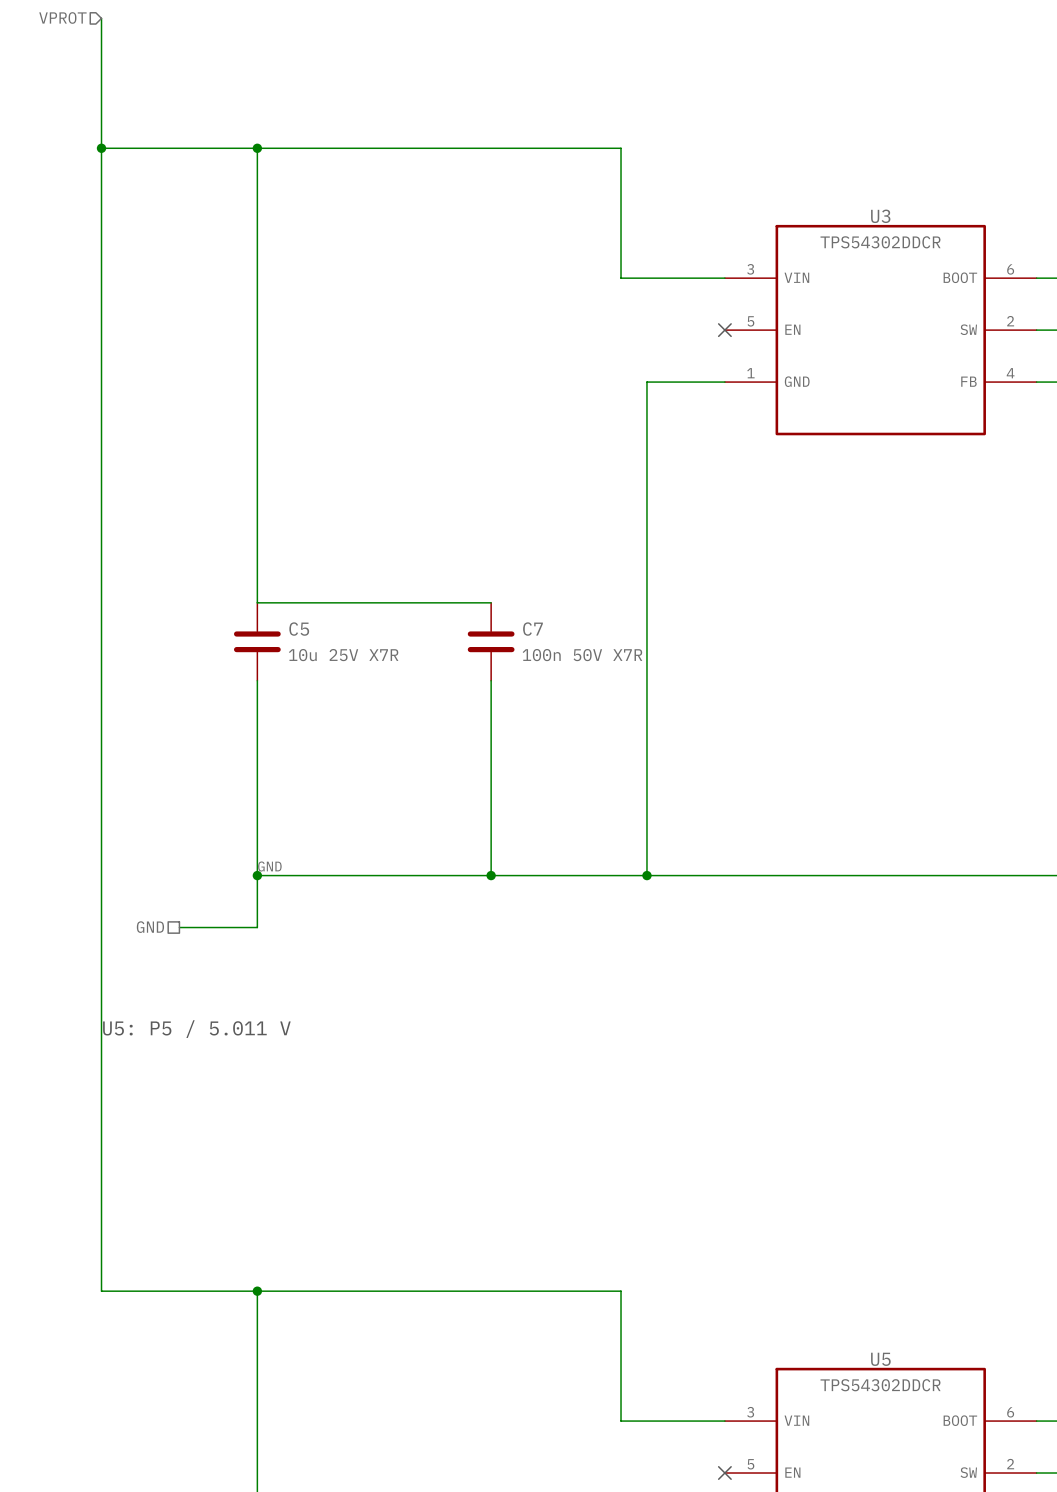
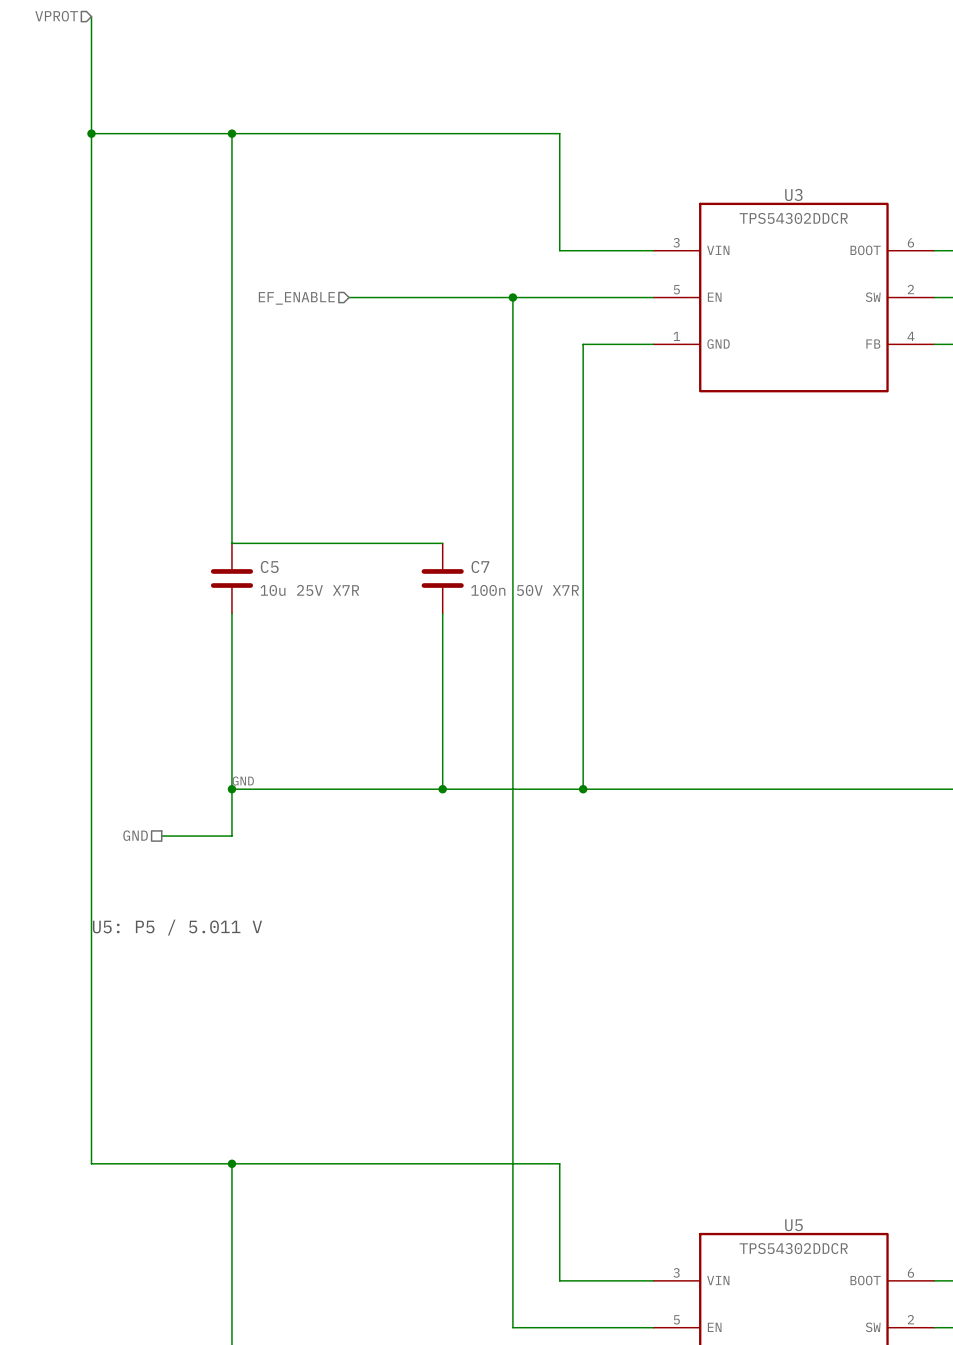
wire: none -> (349, 297) (653, 297)
wire: none -> (512, 297) (512, 1327) (653, 1327)
junction: none -> (512, 297)
no-connect mark: (724, 330) -> none
hierarchical label: none -> EF_ENABLE (296, 298)
no-connect mark: (724, 1473) -> none

